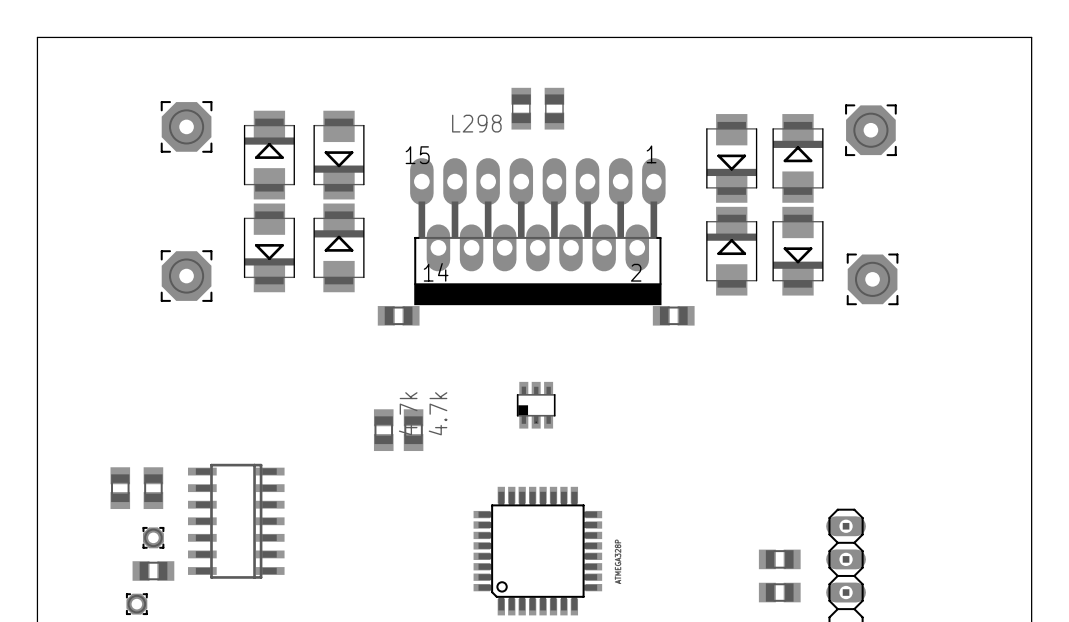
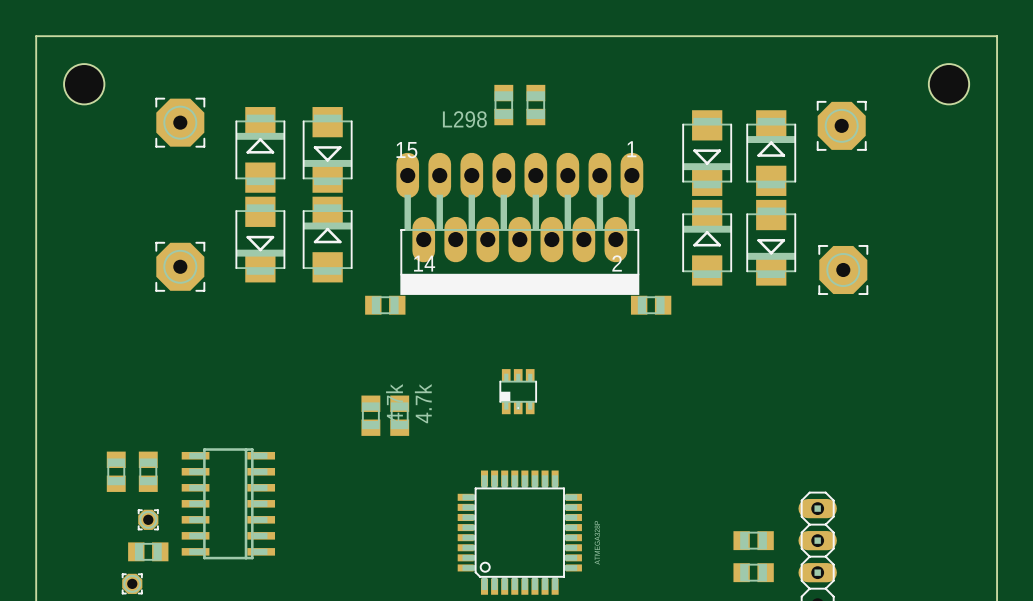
hole: none -> (84, 84)
hole: none -> (949, 84)

